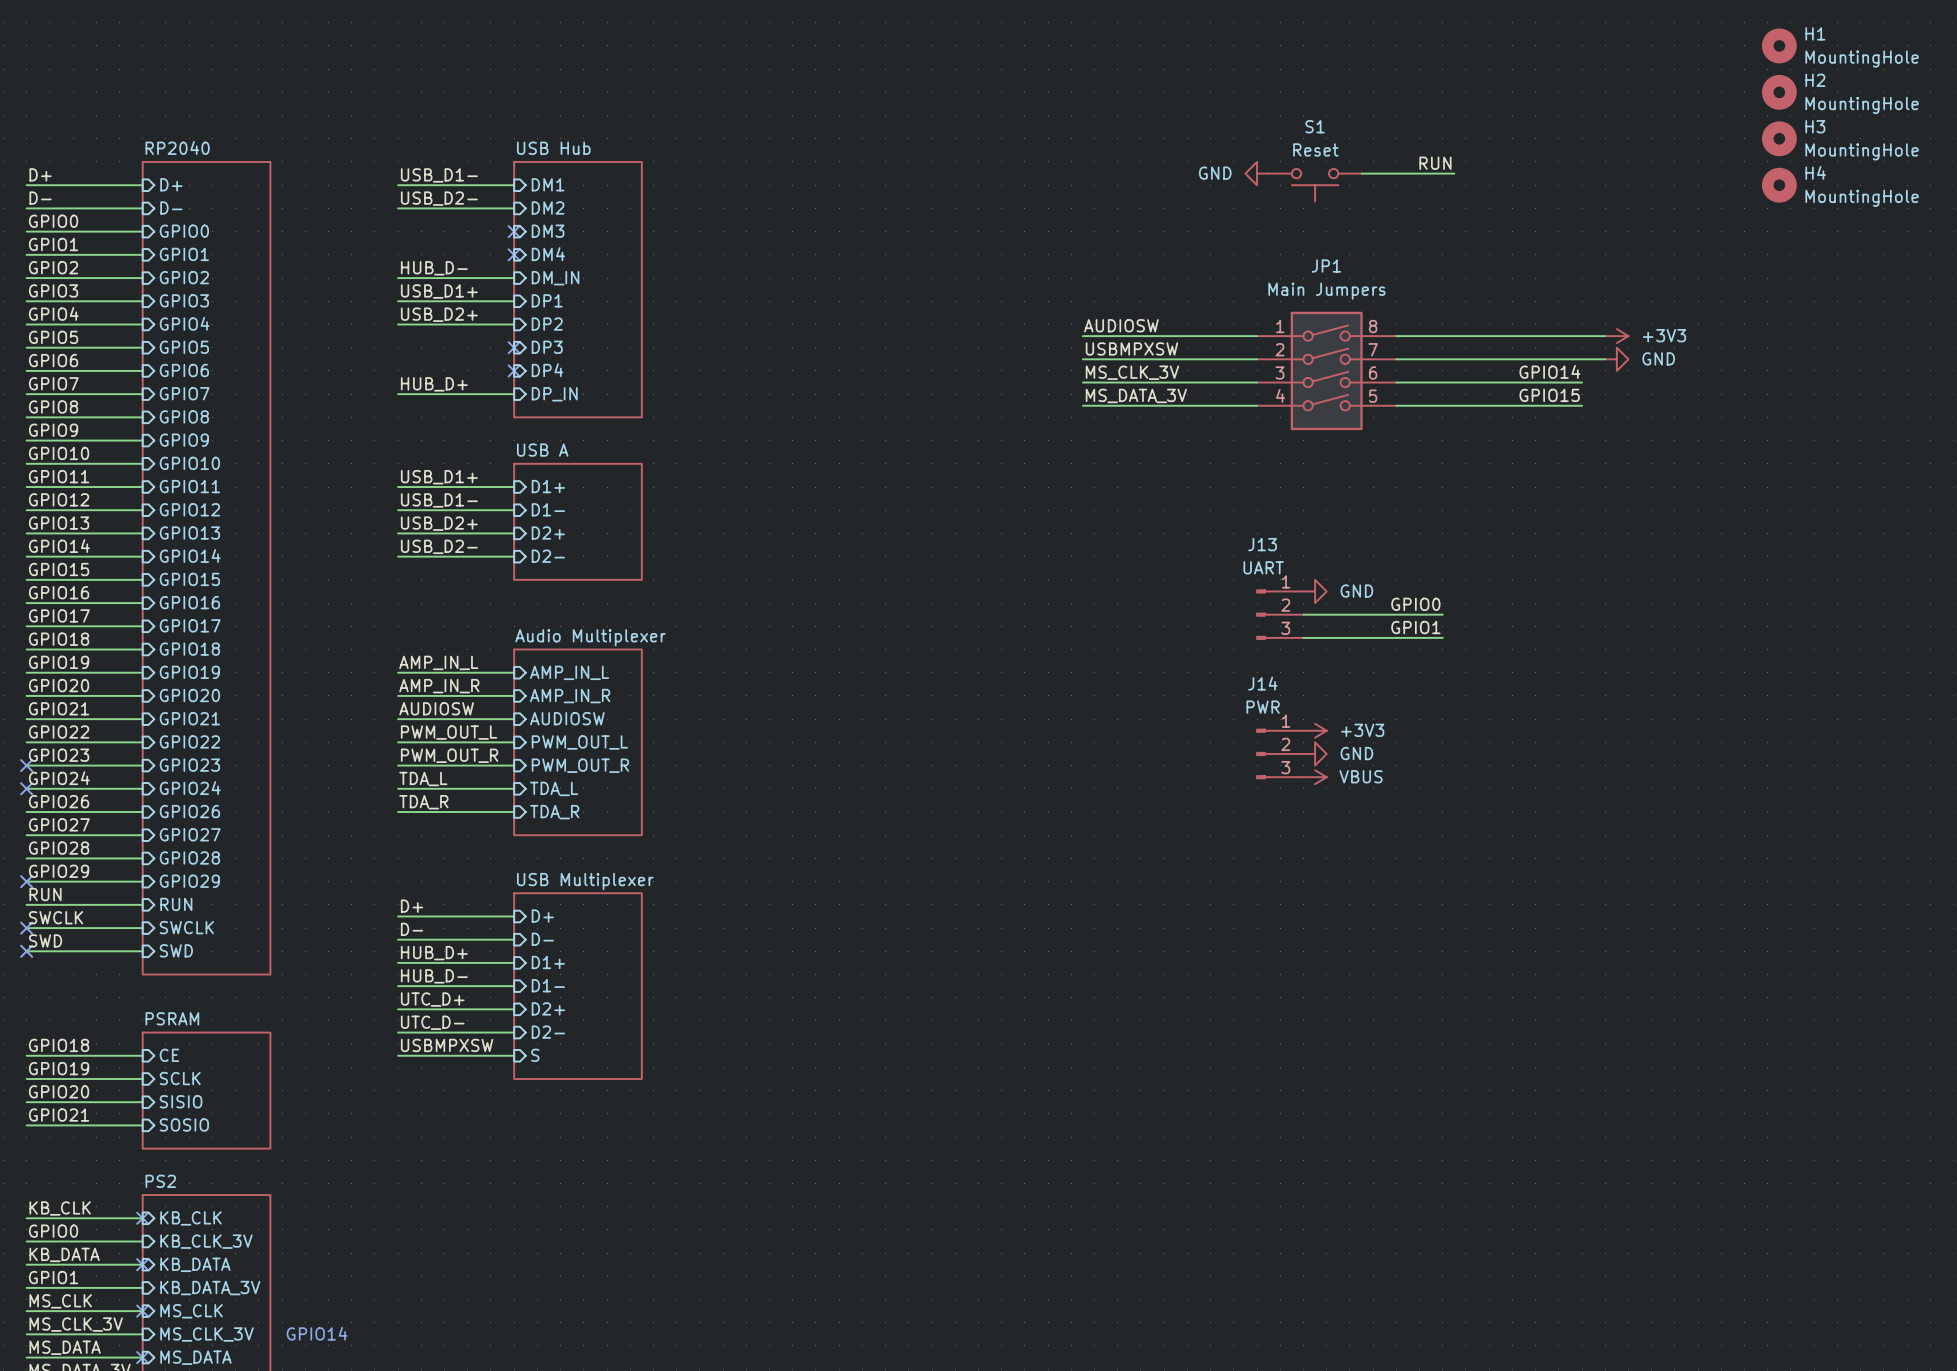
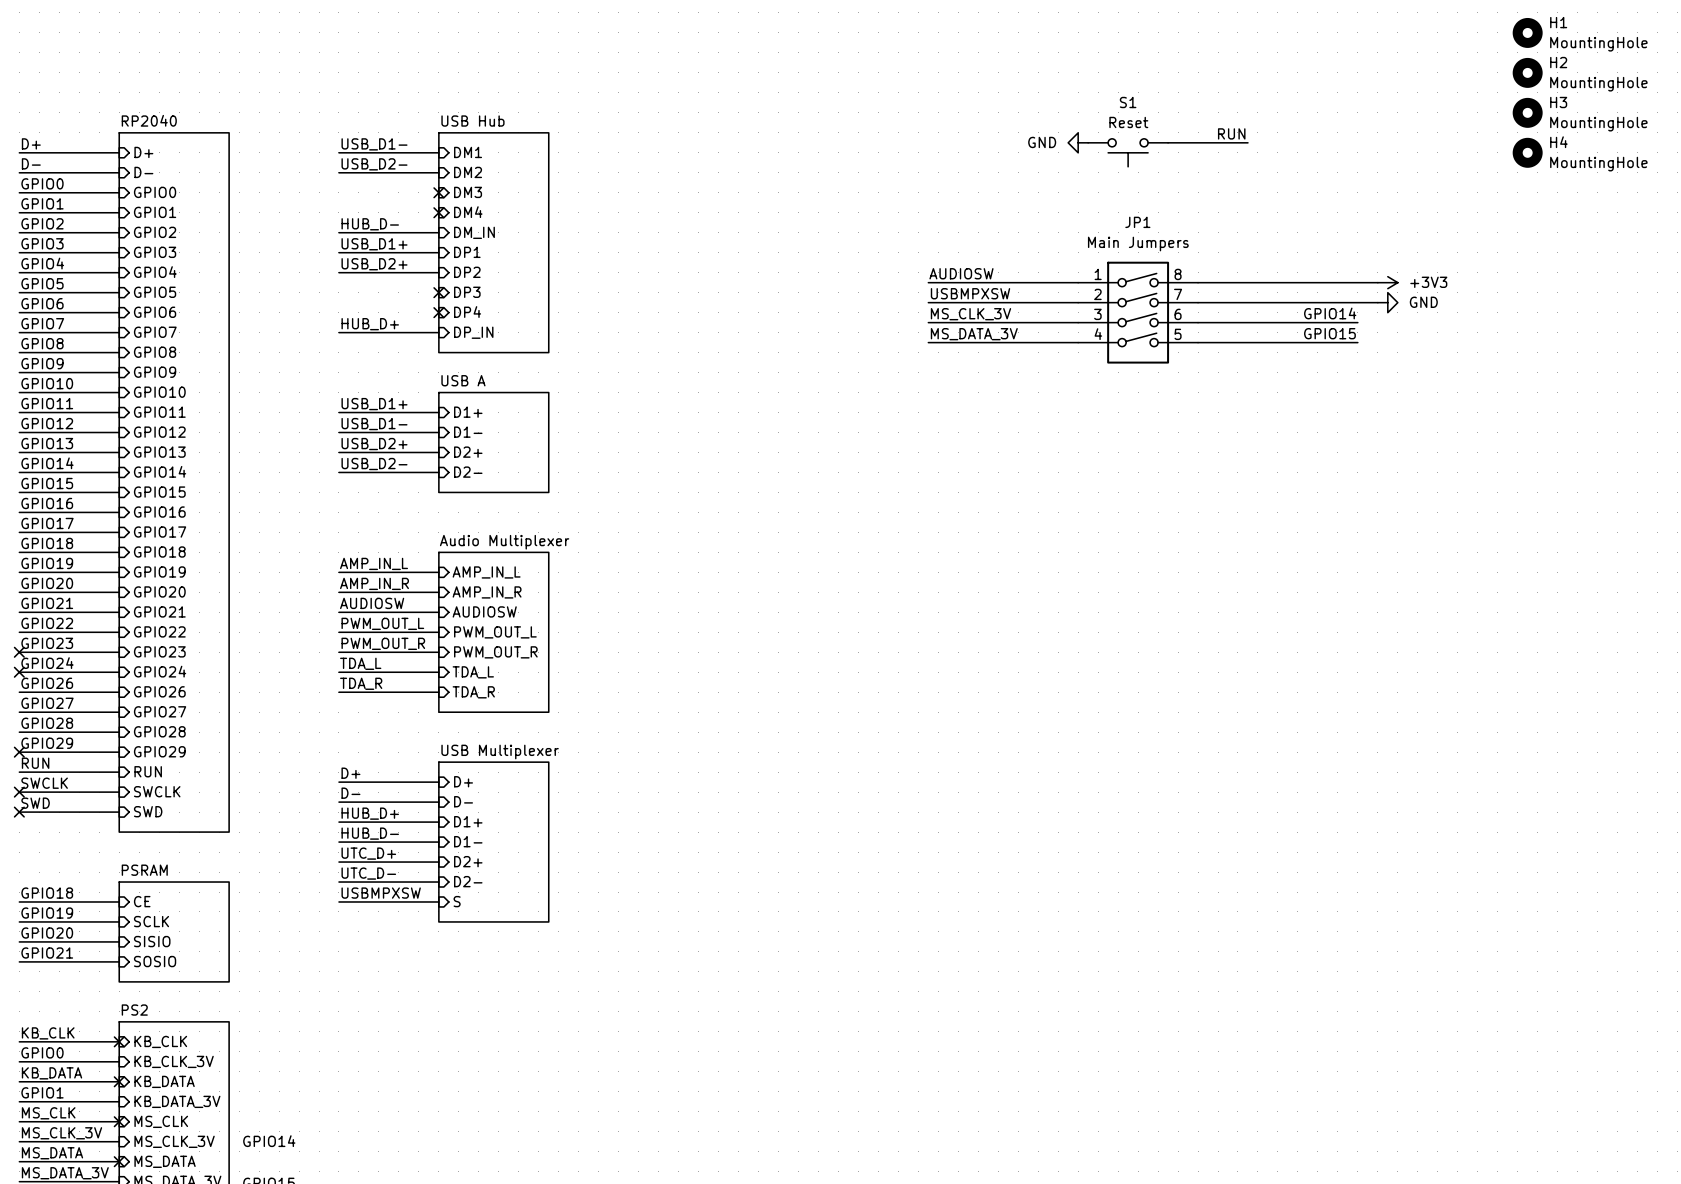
power symbol: GND (1315, 591) -> none
label: GPIO0 (1415, 604) -> none
J13: UART (1279, 614) -> none
wire: (1303, 614) (1442, 614) -> none
label: GPIO1 (1415, 627) -> none
wire: (1303, 637) (1442, 637) -> none
power symbol: +3V3 (1315, 730) -> none
J14: PWR (1279, 753) -> none
power symbol: GND (1315, 753) -> none
power symbol: VBUS (1315, 777) -> none

